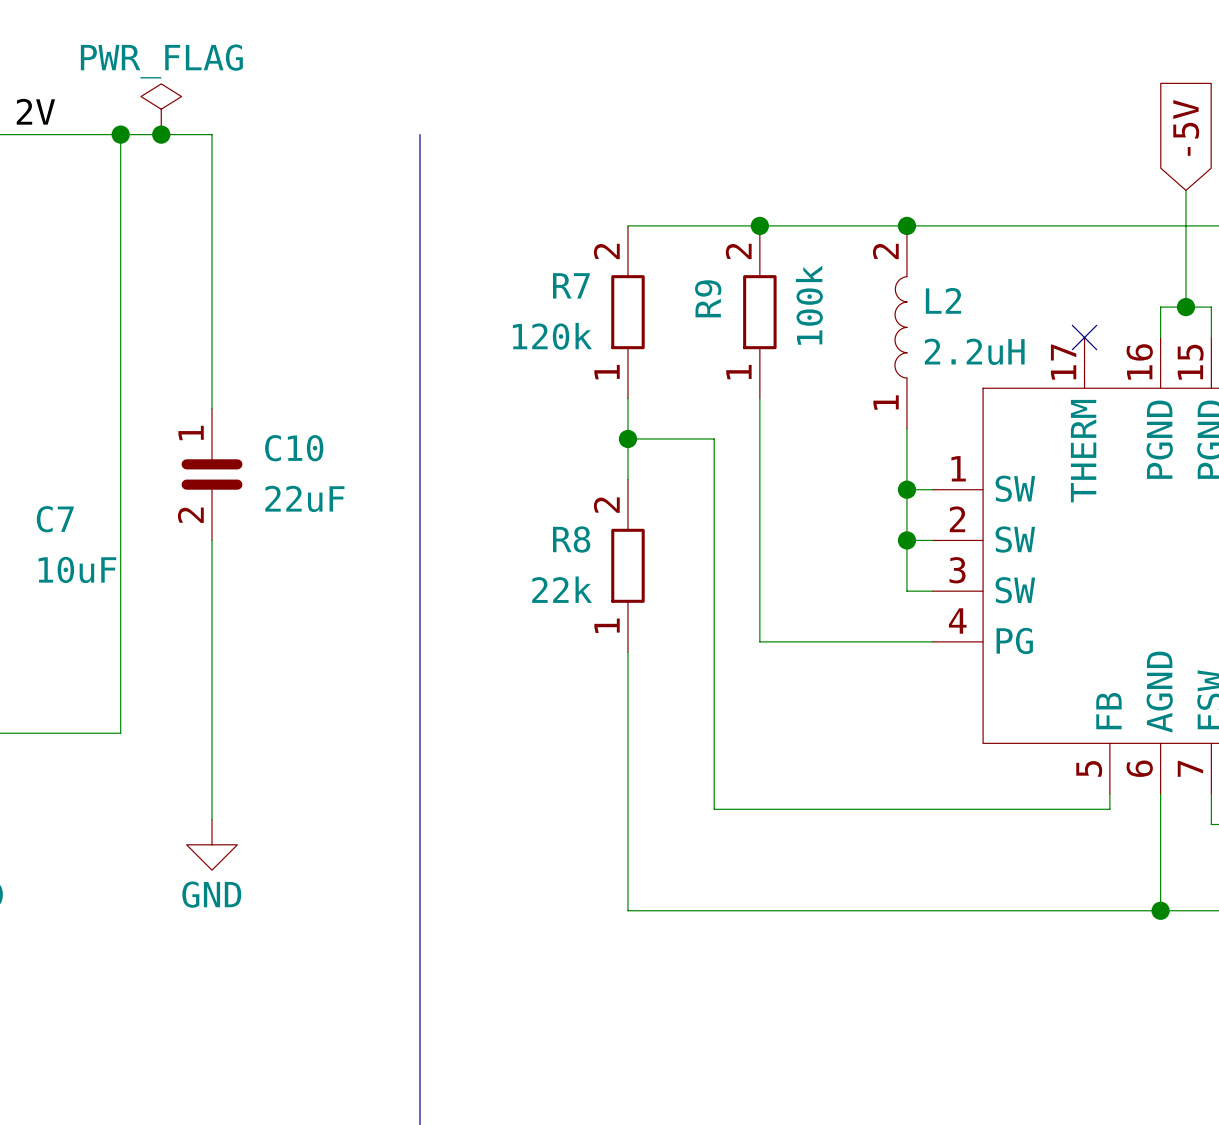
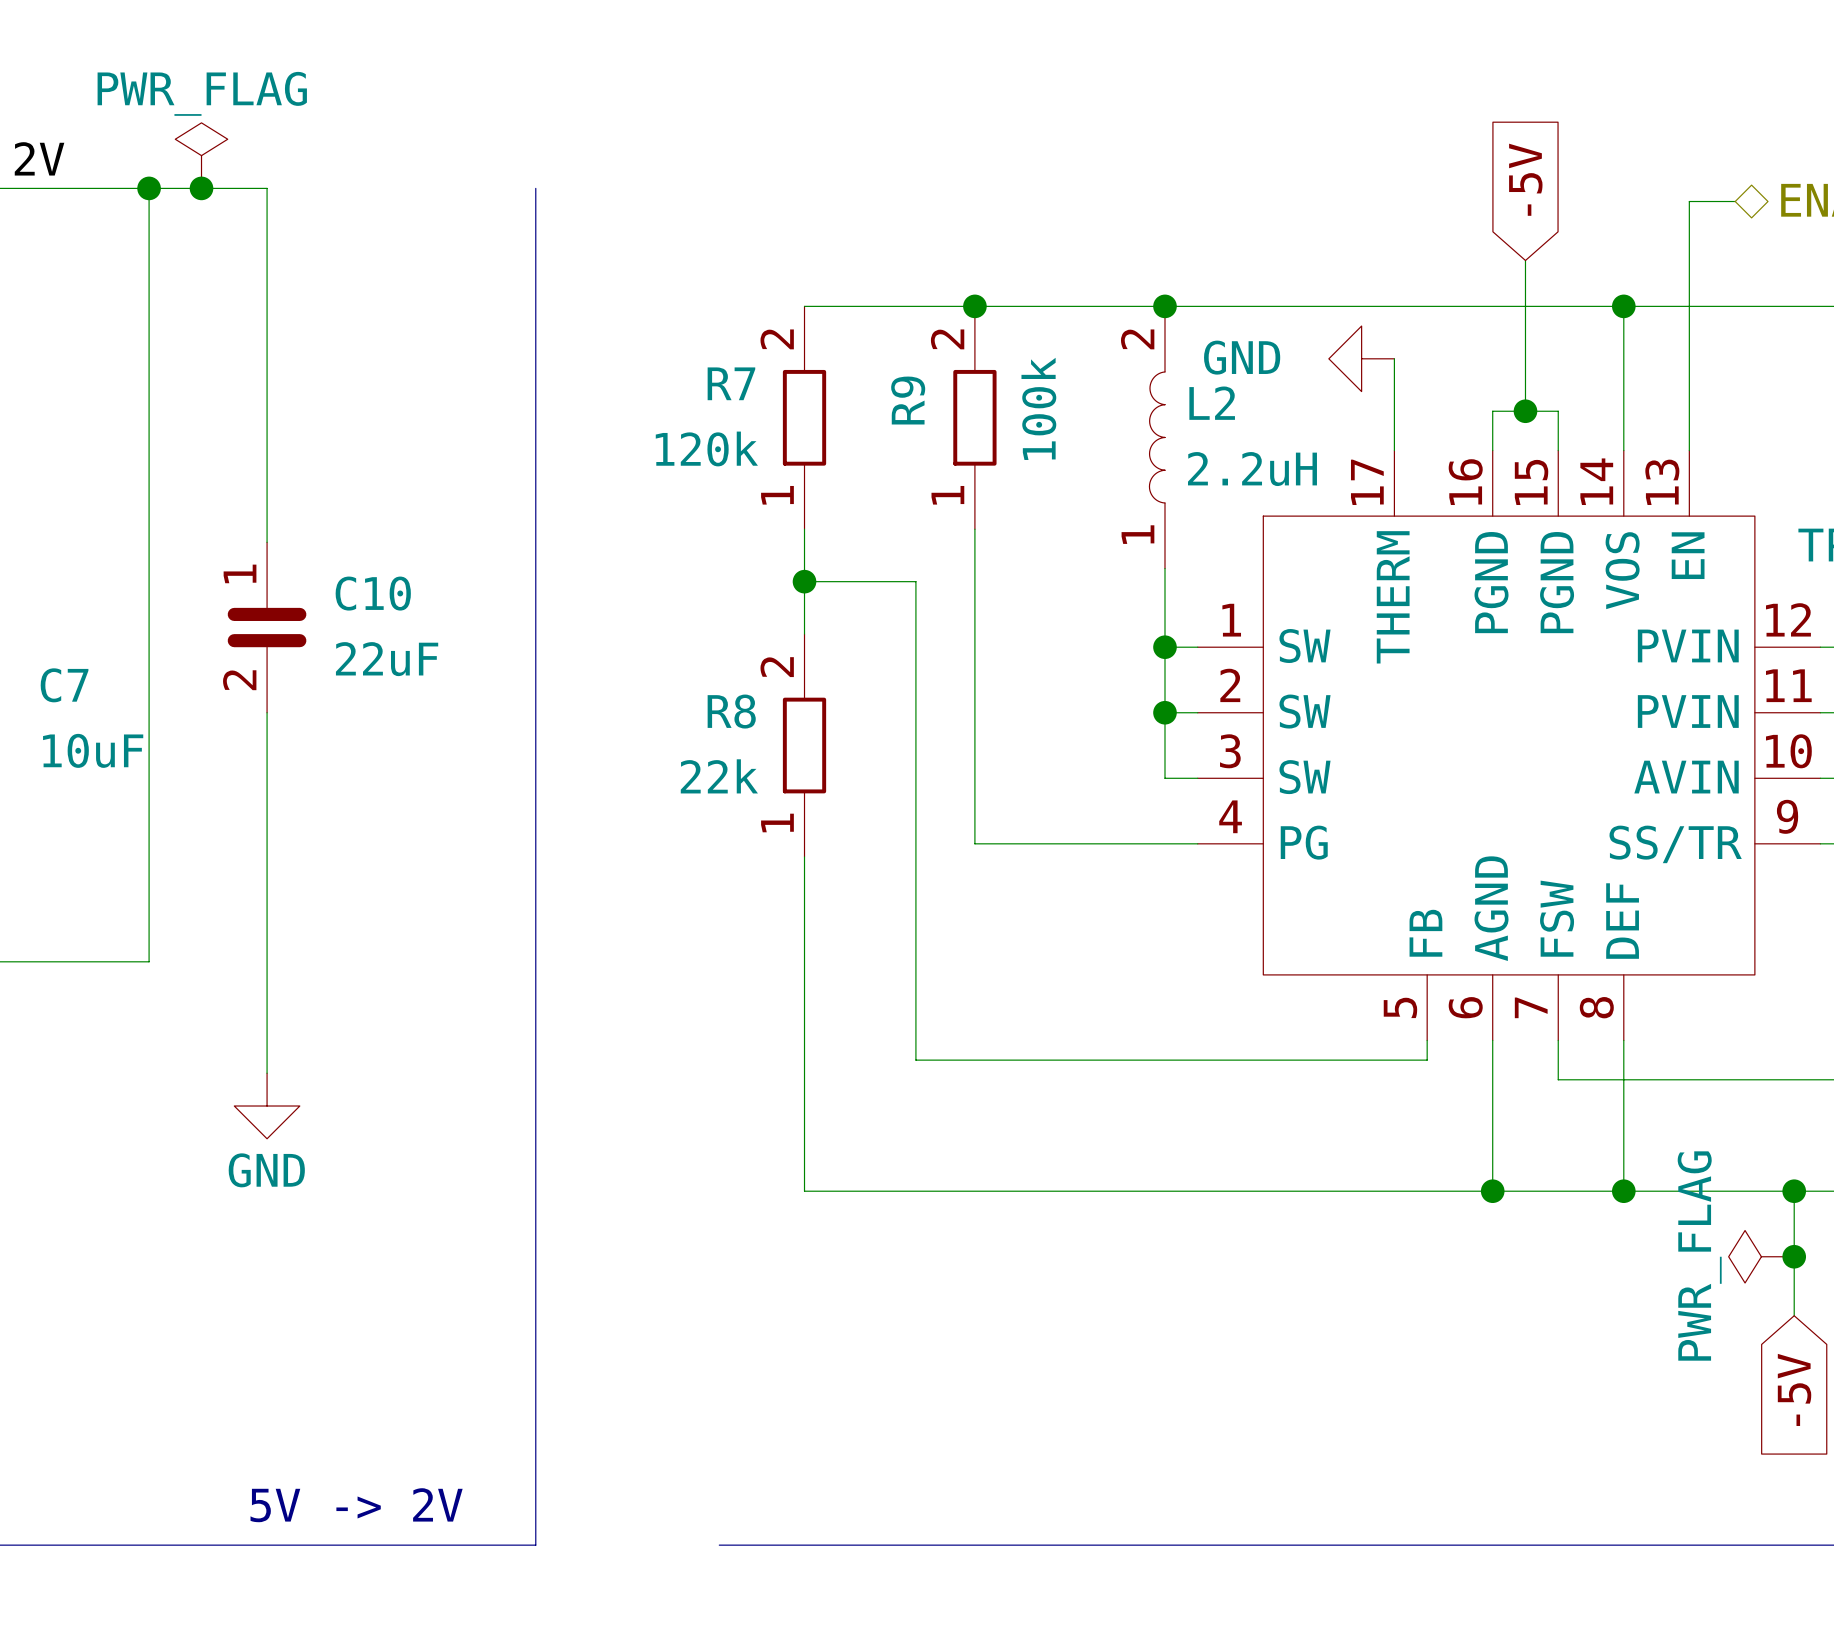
power symbol: none -> GND (1361, 358)
wire: none -> (1394, 358) (1394, 450)
no-connect mark: (1084, 337) -> none

